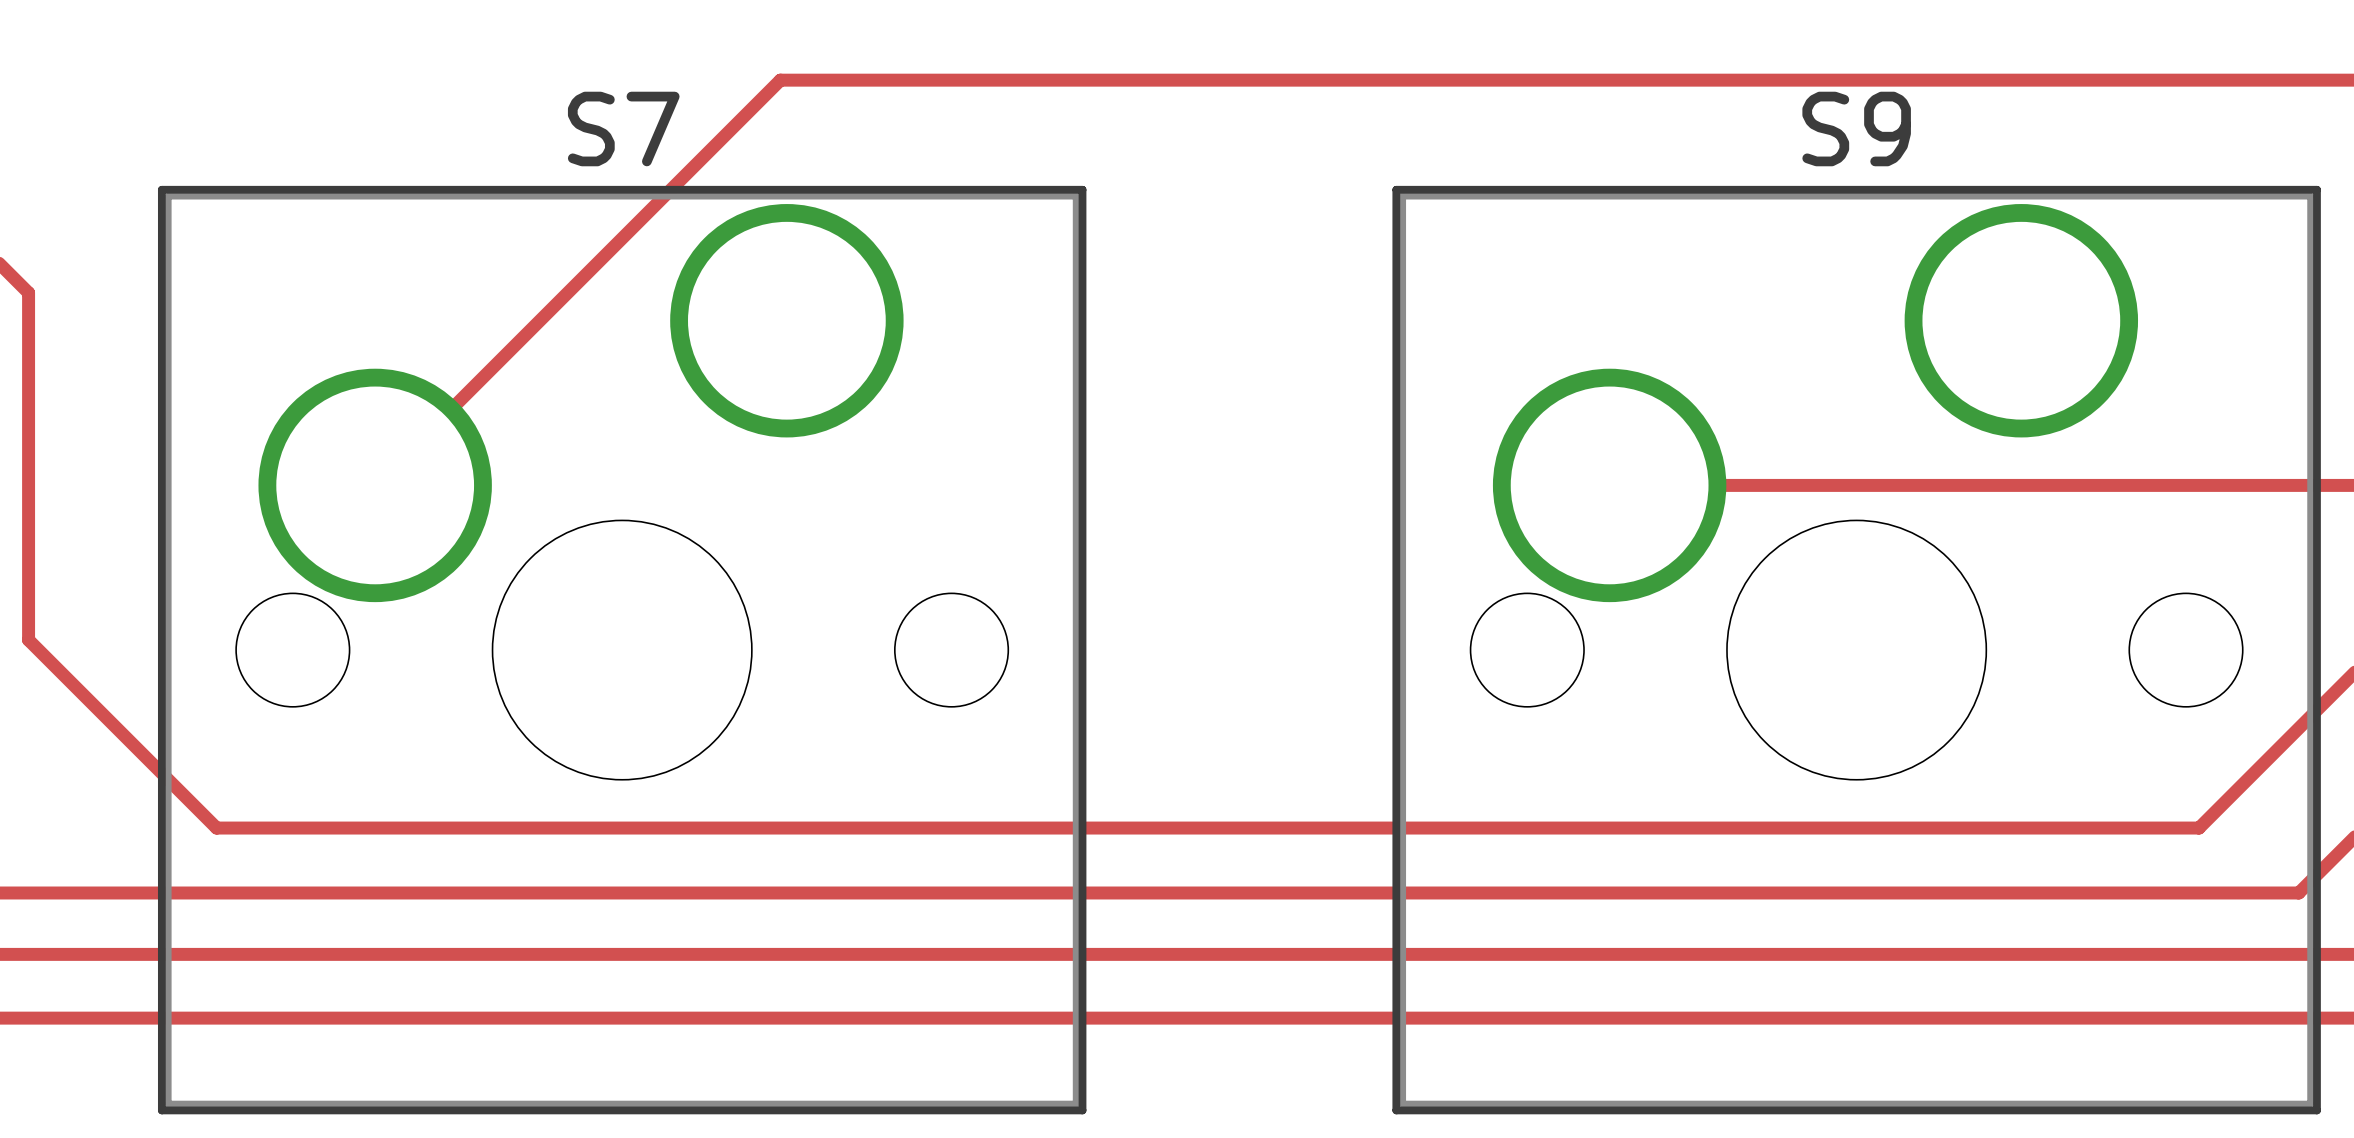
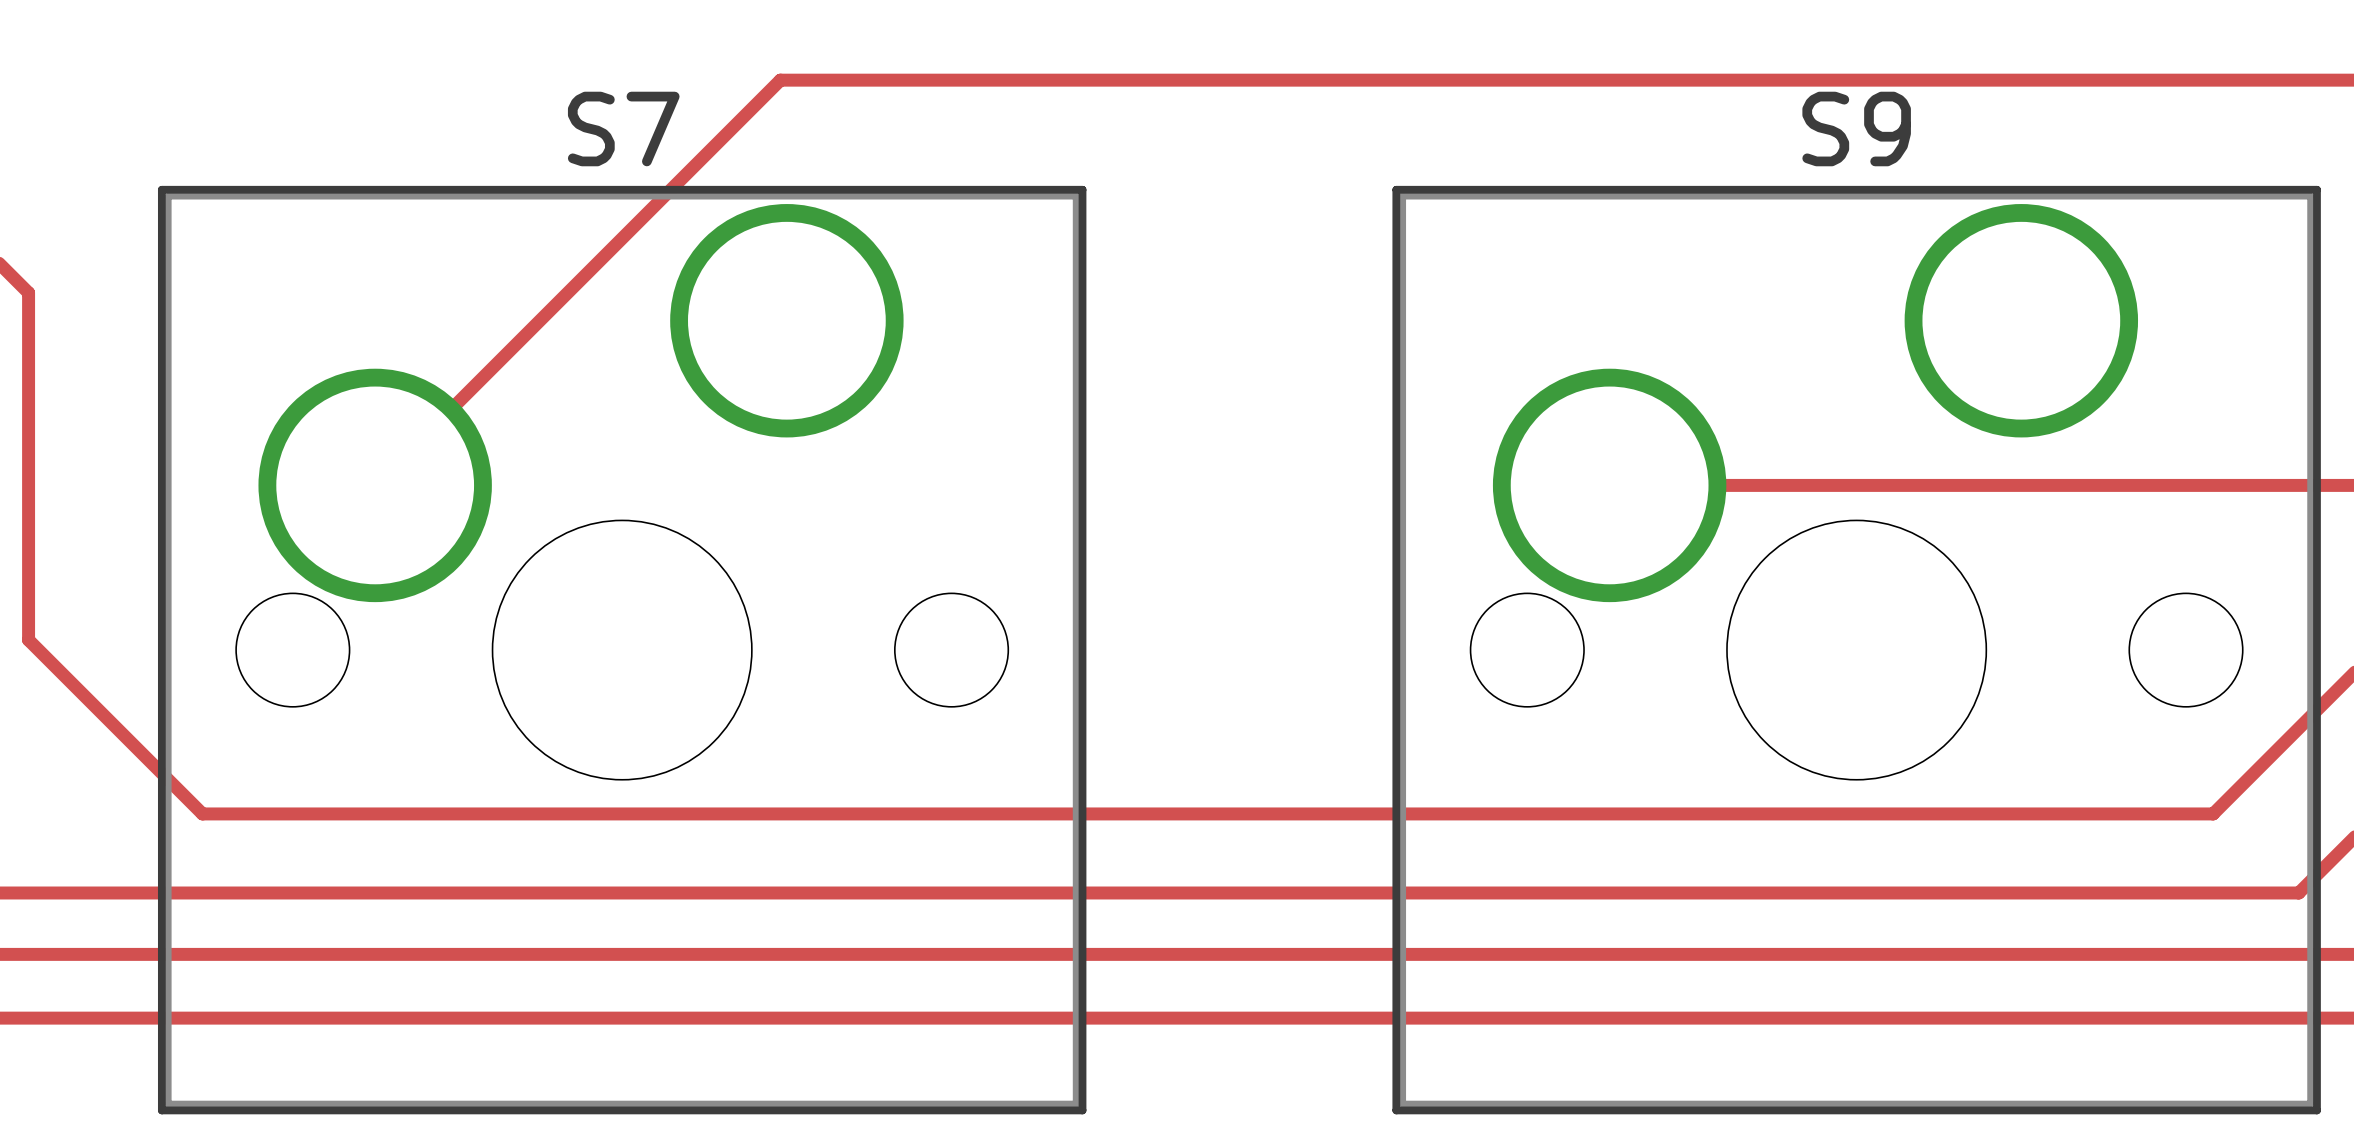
track: (202, 813) (216, 828) (2199, 828) (2213, 813) -> (202, 813) (2213, 813)

